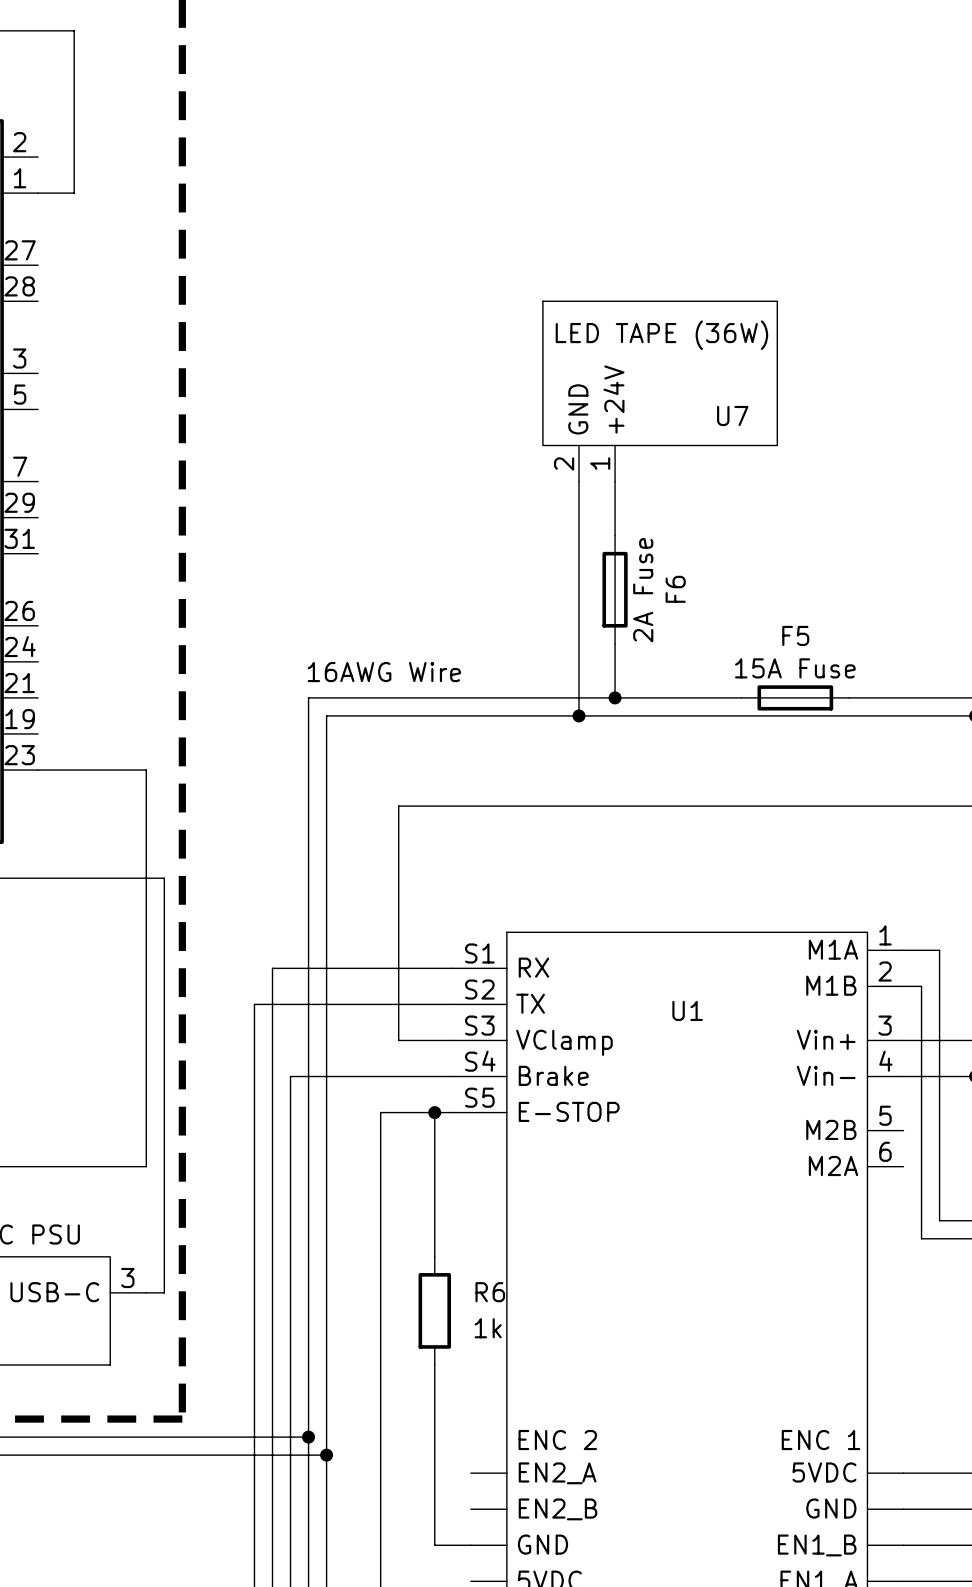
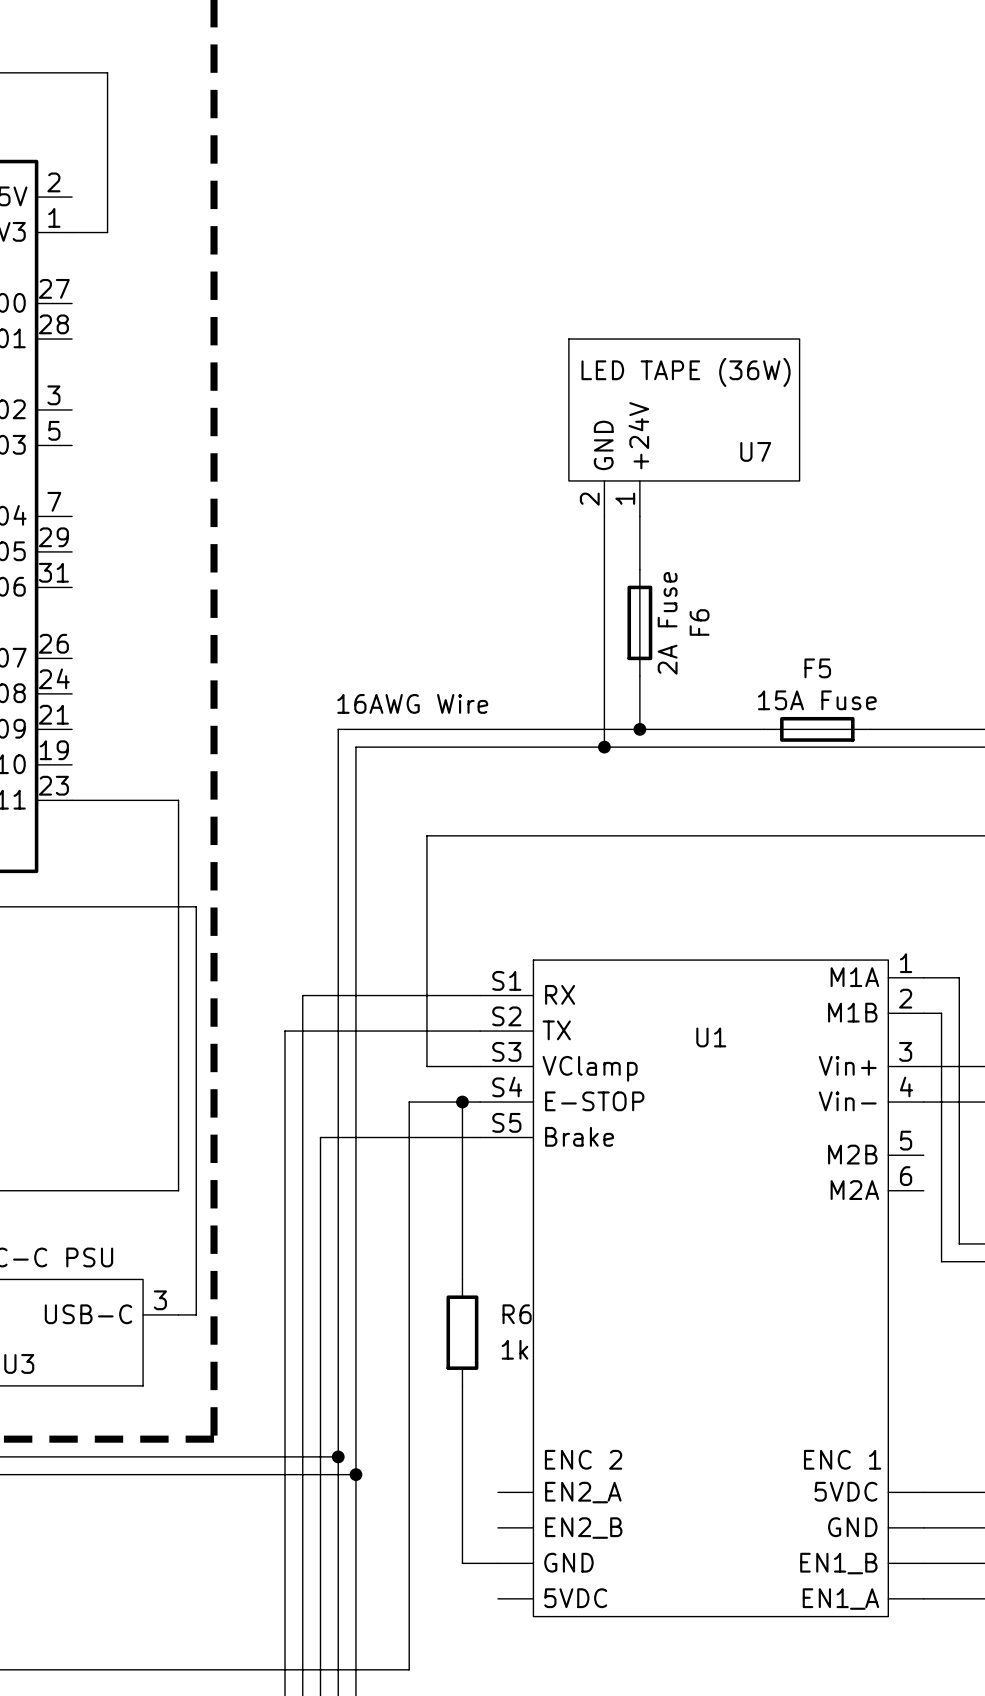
U1 pin name: Brake (553, 1075) -> E-STOP (594, 1101)
wire: (380, 1076) (290, 1076) (290, 1112) -> (409, 1102) (409, 1137) (320, 1137)
wire: none -> (462, 1102) (462, 1137)
U1 pin name: E-STOP (569, 1111) -> Brake (579, 1136)
junction position: (434, 1112) -> (462, 1102)

